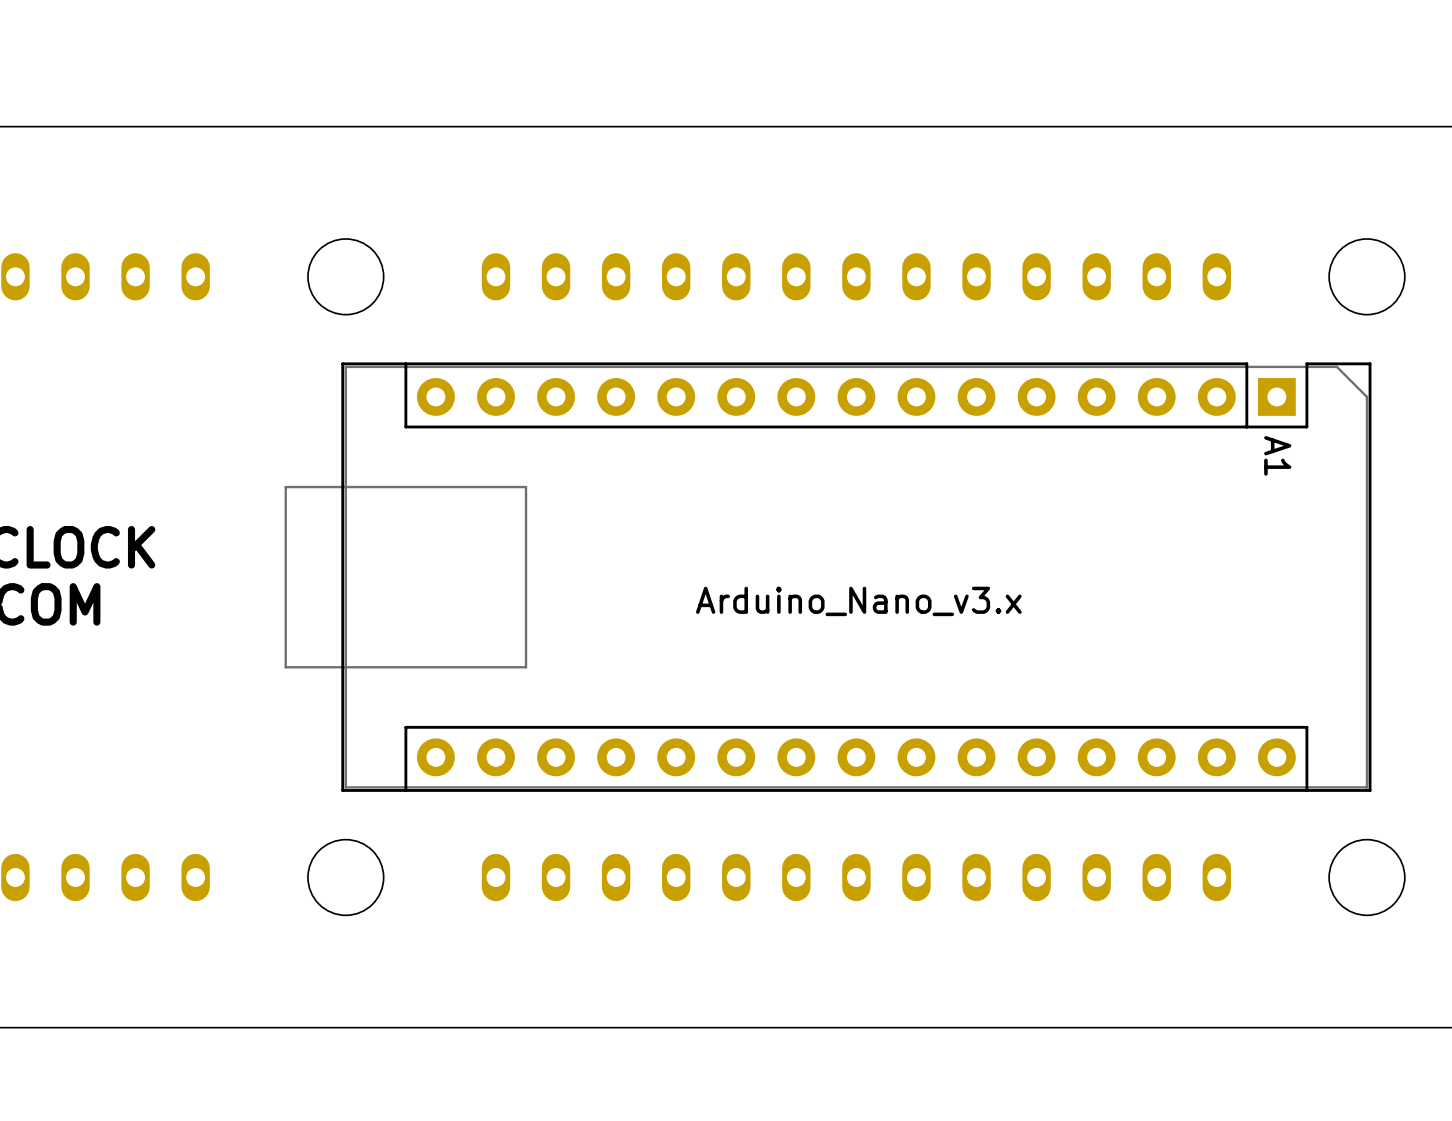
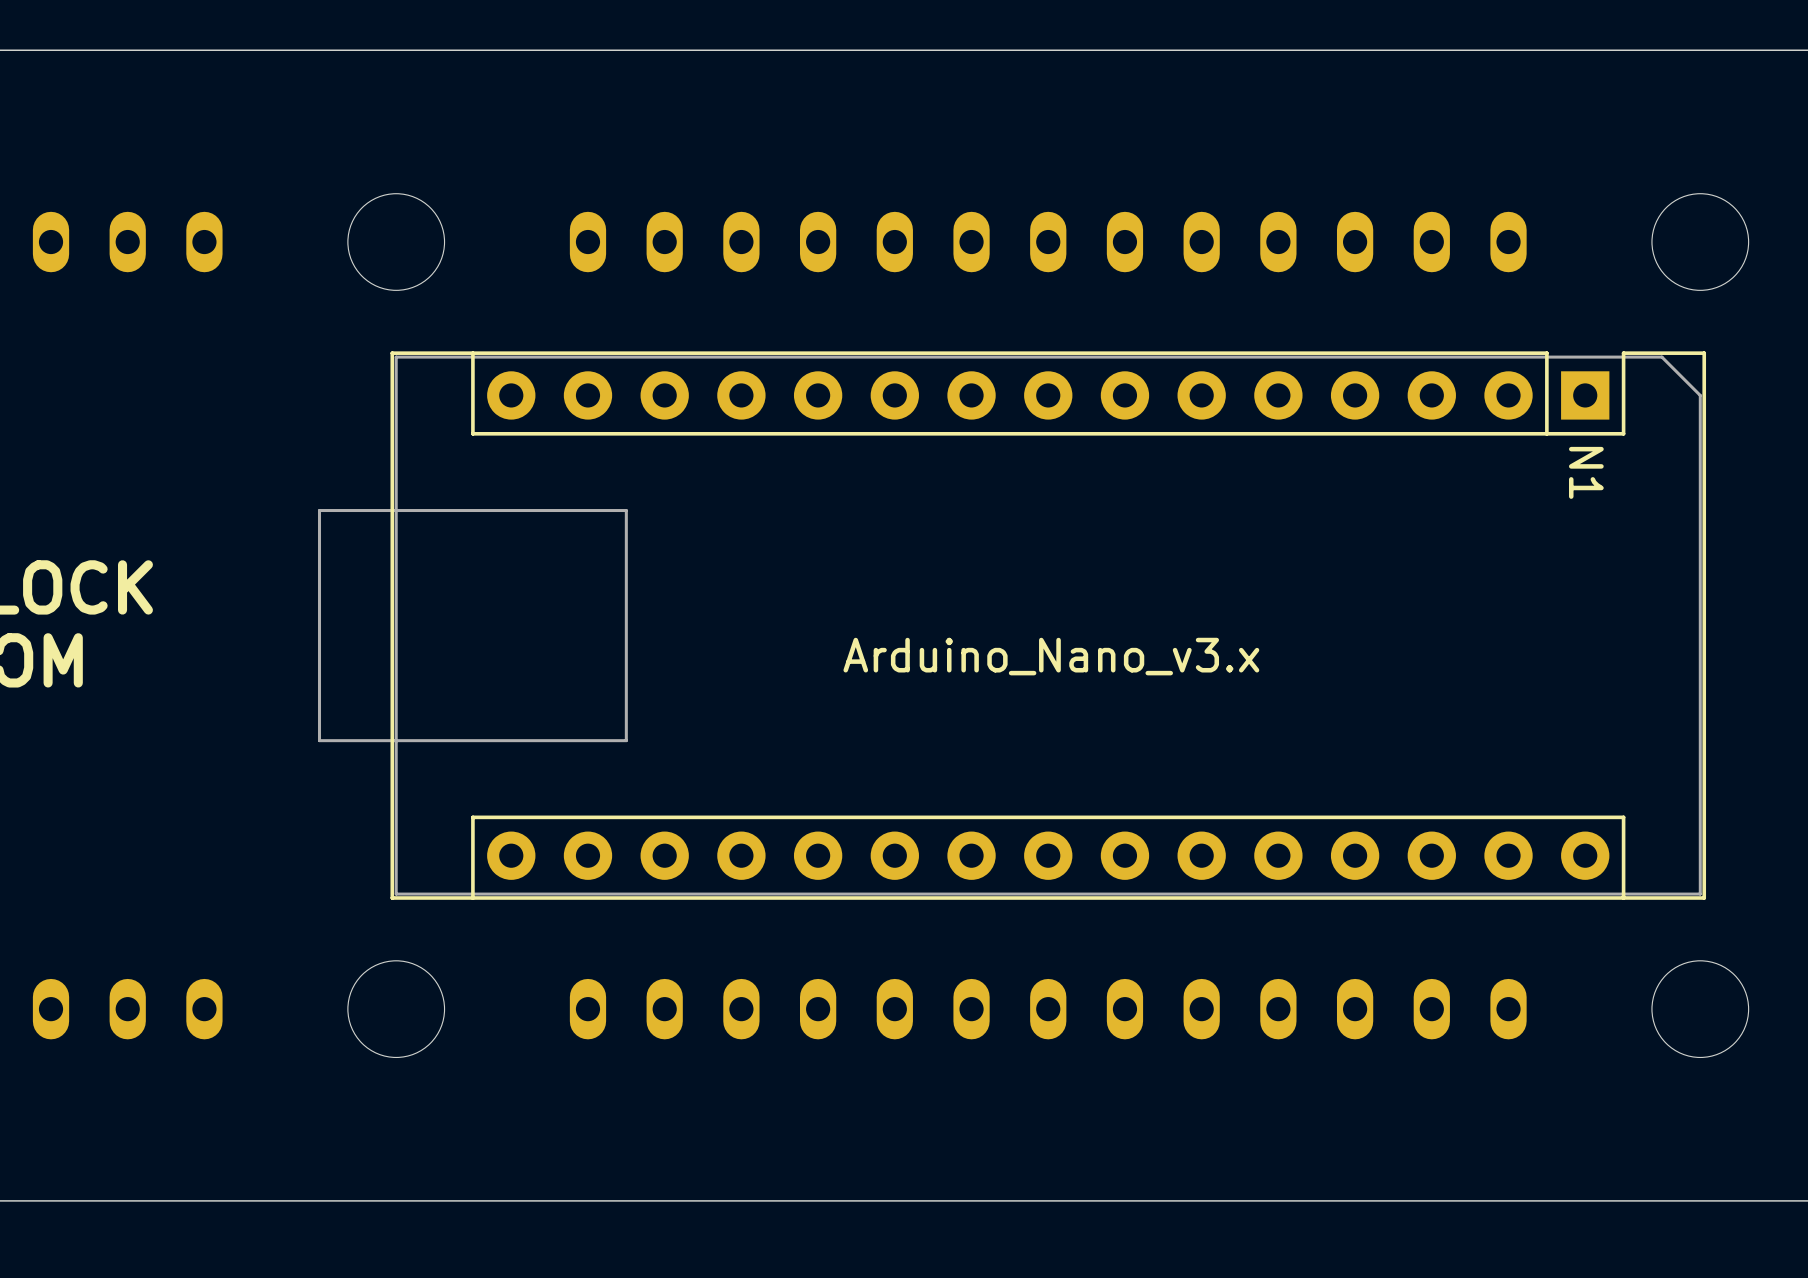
A1 name: A1 (1277, 455) -> N1 (1586, 472)

